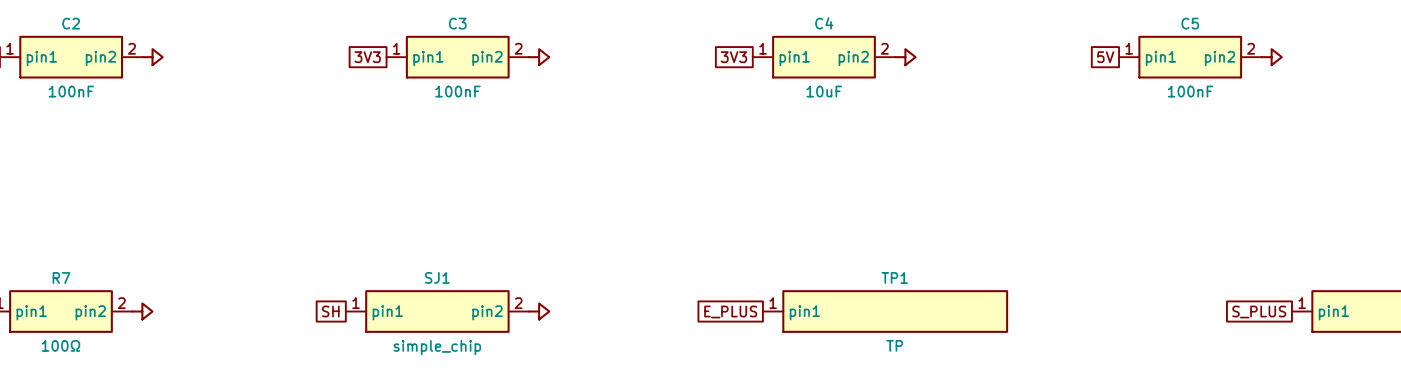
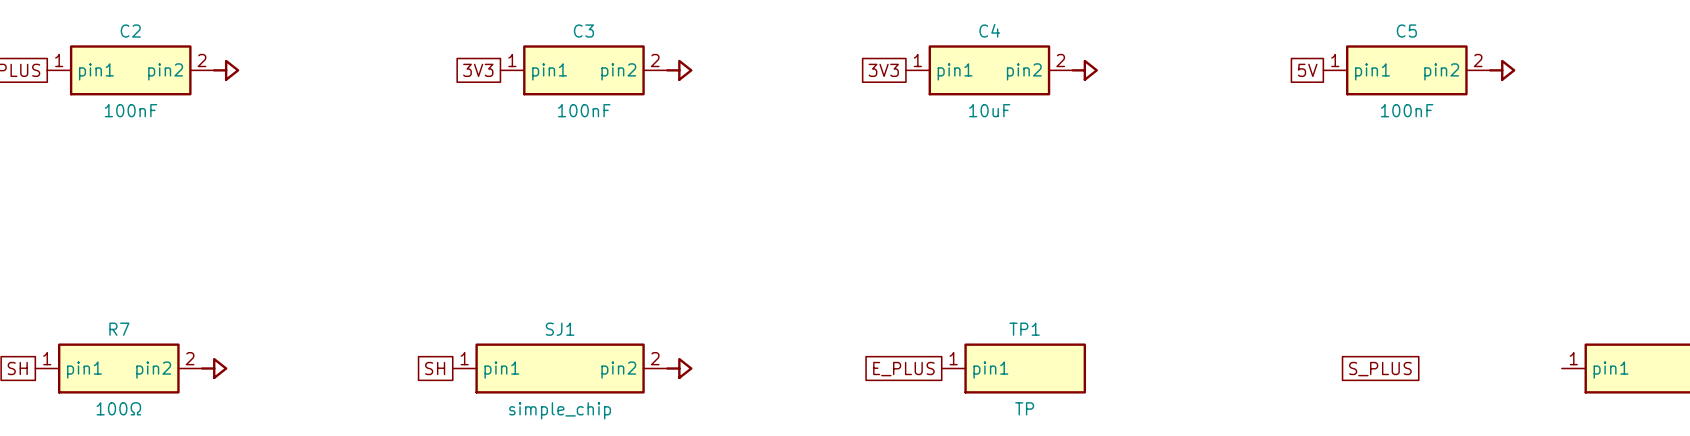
global label position: 3V3 (733, 57) -> 3V3 (883, 70)
C4 position: (823, 57) -> (989, 70)
power symbol position: (905, 57) -> (1084, 70)
global label position: 5V (1105, 57) -> 5V (1307, 70)
C5 position: (1190, 57) -> (1406, 70)
power symbol position: (1271, 57) -> (1502, 70)
TP1 symbol: [762, 290, 1009, 333] -> [941, 343, 1087, 394]
global label position: S_PLUS (1259, 311) -> S_PLUS (1380, 369)

